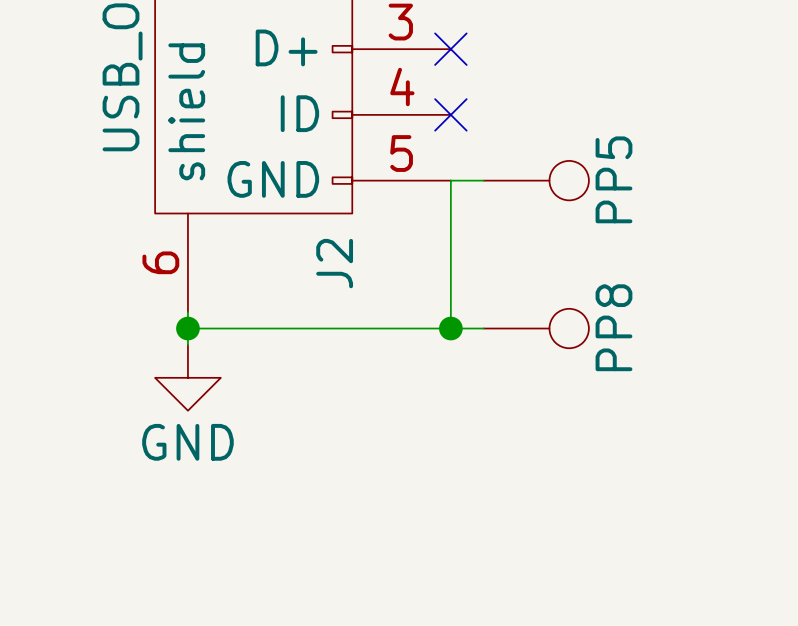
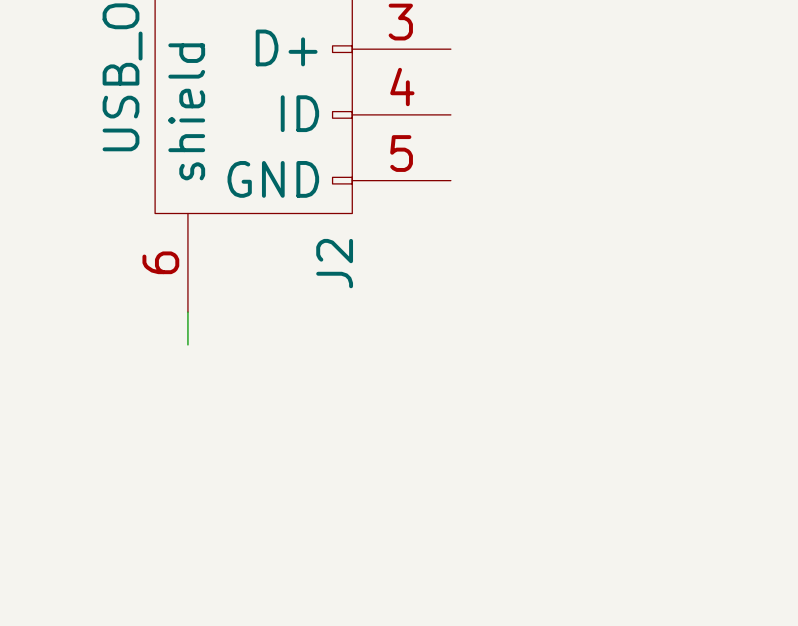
no-connect mark: (450, 49) -> none
no-connect mark: (450, 114) -> none
wire: (483, 180) (450, 180) (450, 328) -> none
PP5: (536, 180) -> none
wire: (187, 328) (483, 328) -> none
junction: (187, 328) -> none
junction: (450, 328) -> none
PP8: (536, 328) -> none
power symbol: GND (187, 377) -> none

